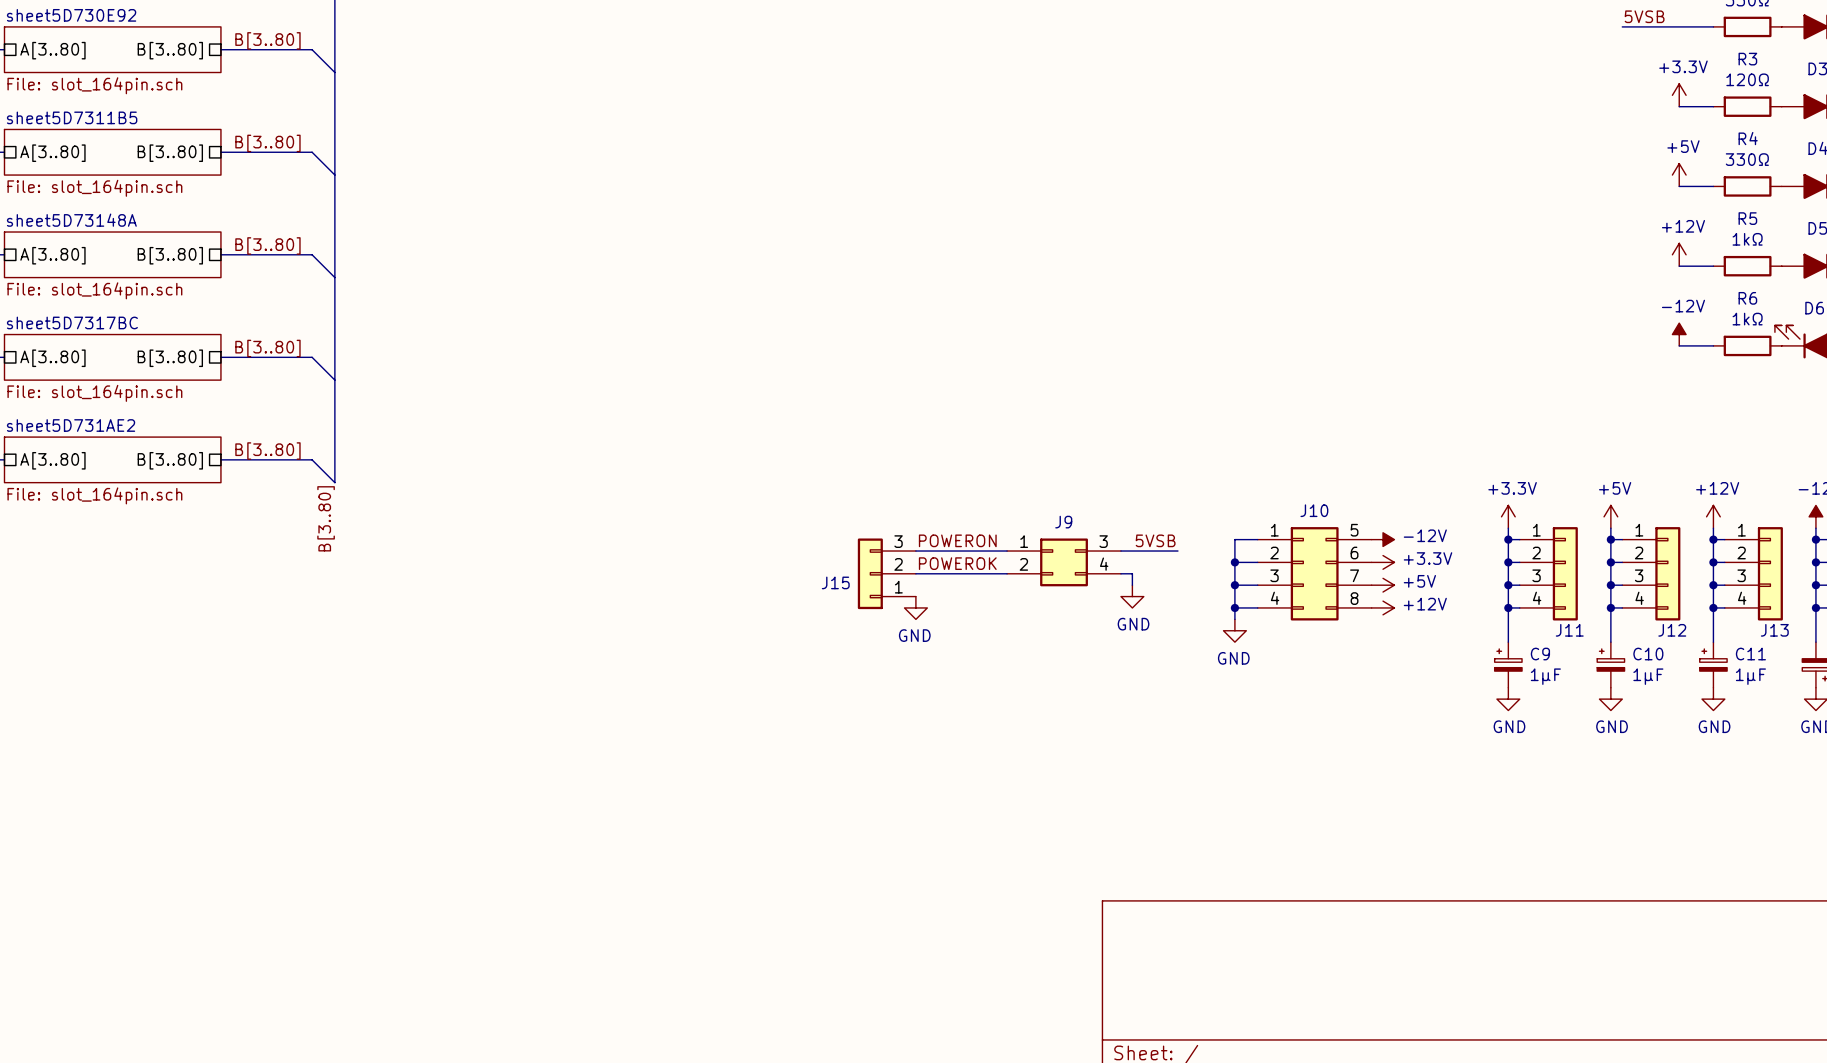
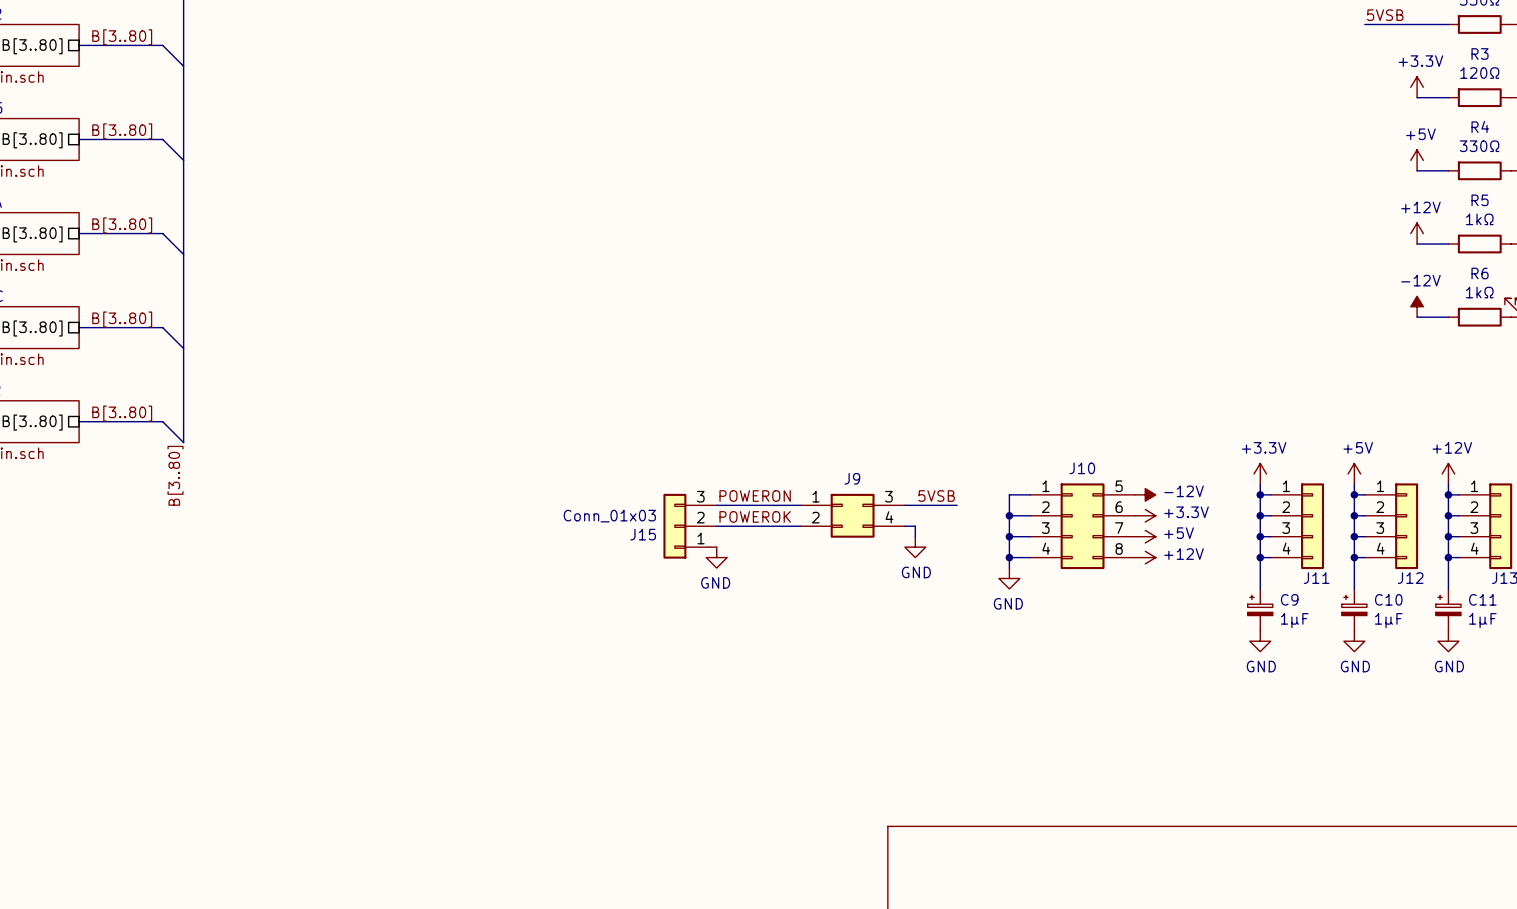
J15 value: none -> Conn_01x03 (609, 516)

